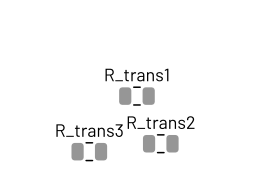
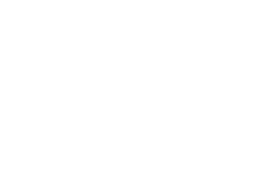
R_trans1: (136, 96) -> none
R_trans2: (160, 143) -> none
R_trans3: (89, 151) -> none

